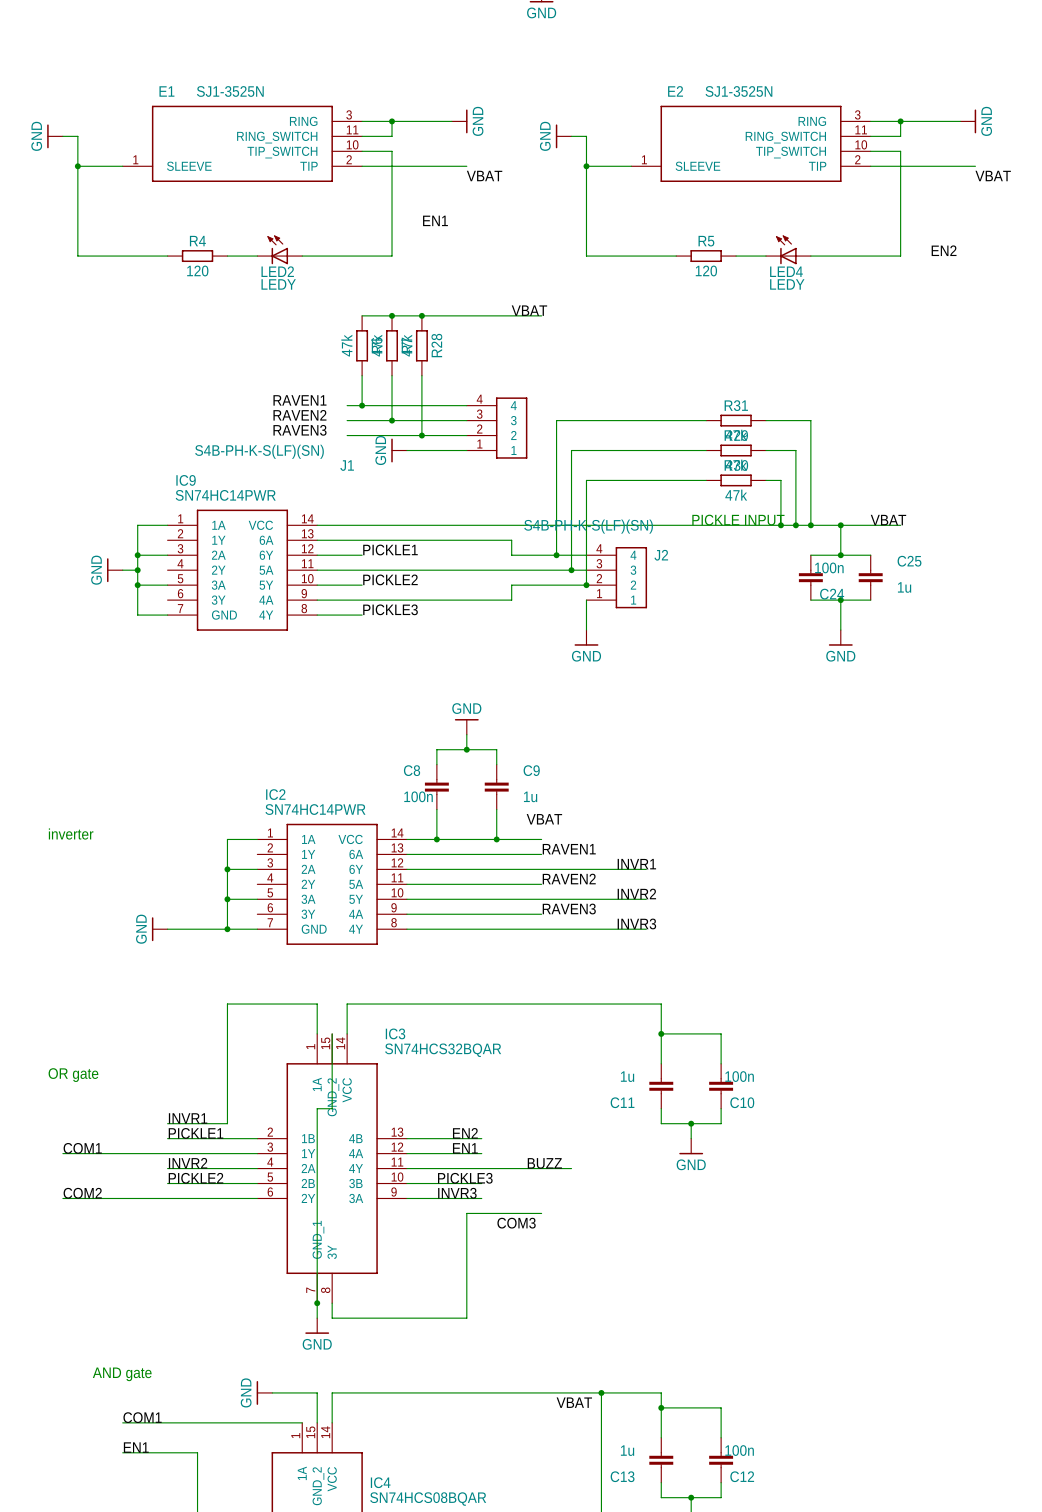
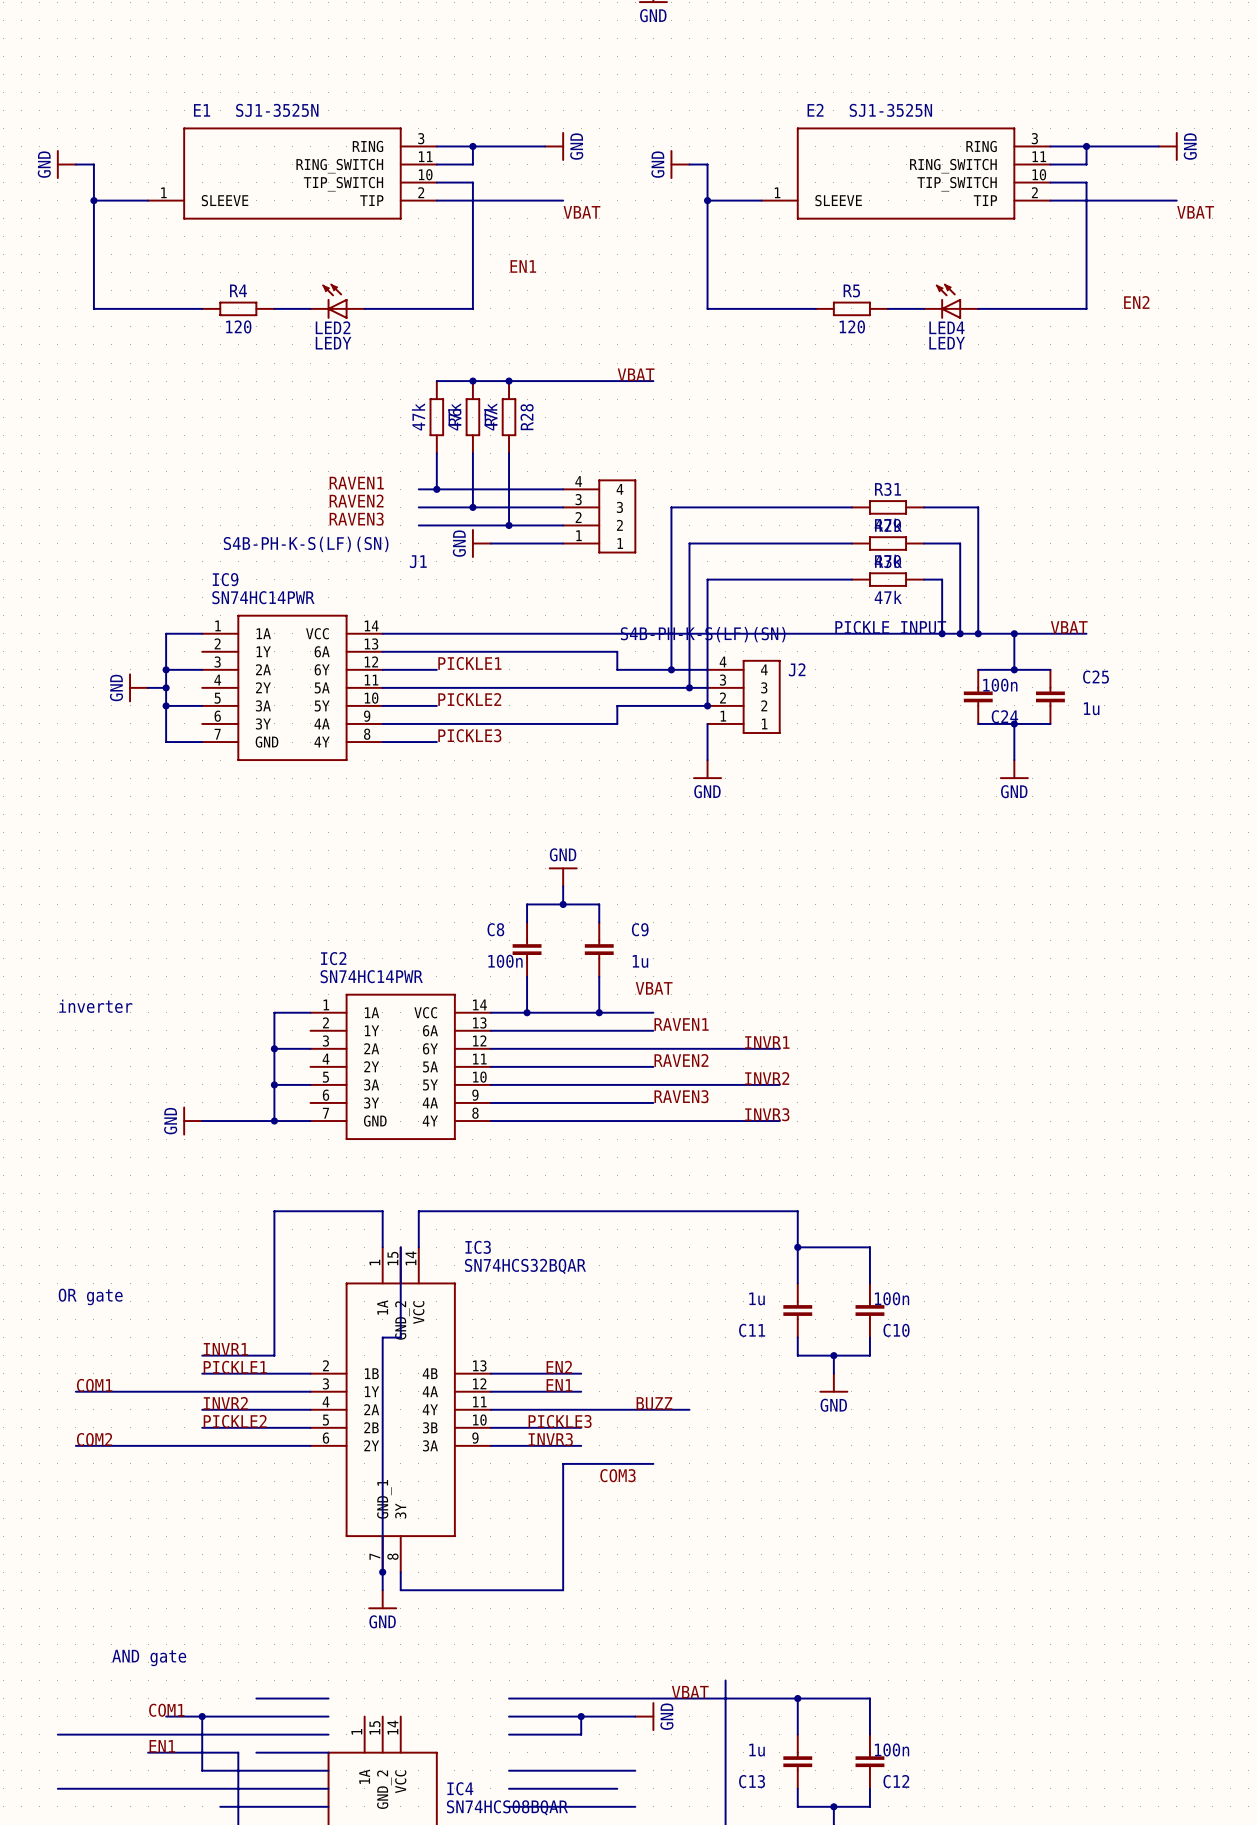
power symbol: GND (264, 1392) -> none
wire: (272, 1392) (317, 1392) (317, 1422) -> none
junction: (601, 1392) -> none
wire: none -> (256, 1698) (328, 1698)
wire: (661, 1407) (661, 1392) (332, 1392) (332, 1422) -> (797, 1698) (509, 1698)
wire: (122, 1422) (137, 1422) -> none
wire: none -> (202, 1716) (202, 1770) (328, 1770)
junction: none -> (202, 1716)
wire: (272, 1422) (302, 1422) -> none
wire: none -> (509, 1716) (635, 1716)
wire: none -> (581, 1716) (581, 1734) (509, 1734)
junction: none -> (581, 1716)
power symbol: none -> GND (644, 1716)
wire: none -> (57, 1734) (328, 1734)
wire: none -> (256, 1752) (328, 1752)
wire: none -> (509, 1770) (635, 1770)
wire: none -> (57, 1788) (328, 1788)
wire: none -> (509, 1788) (617, 1788)
wire: none -> (220, 1806) (328, 1806)
wire: none -> (509, 1806) (635, 1806)

